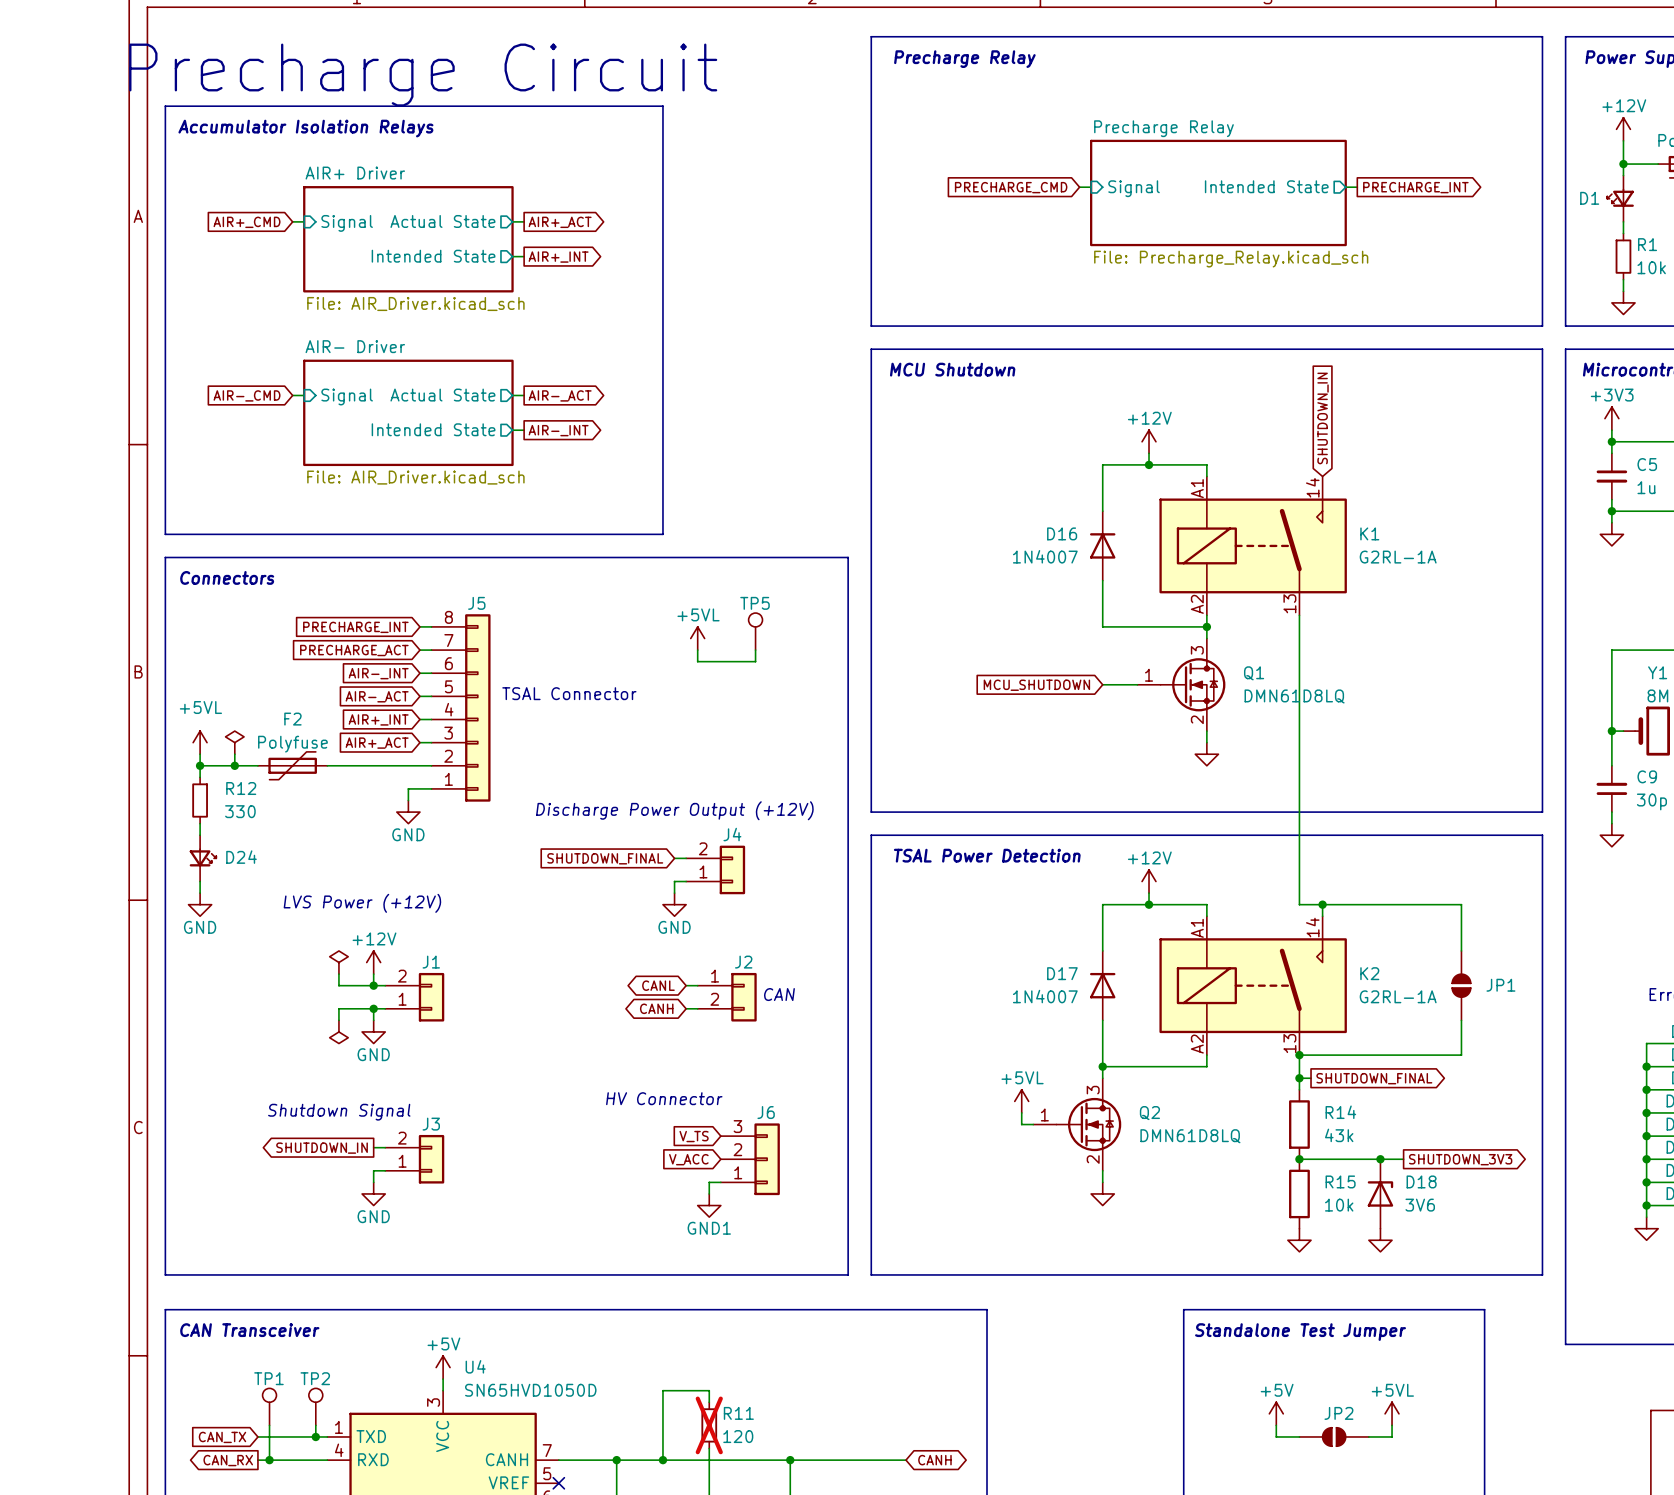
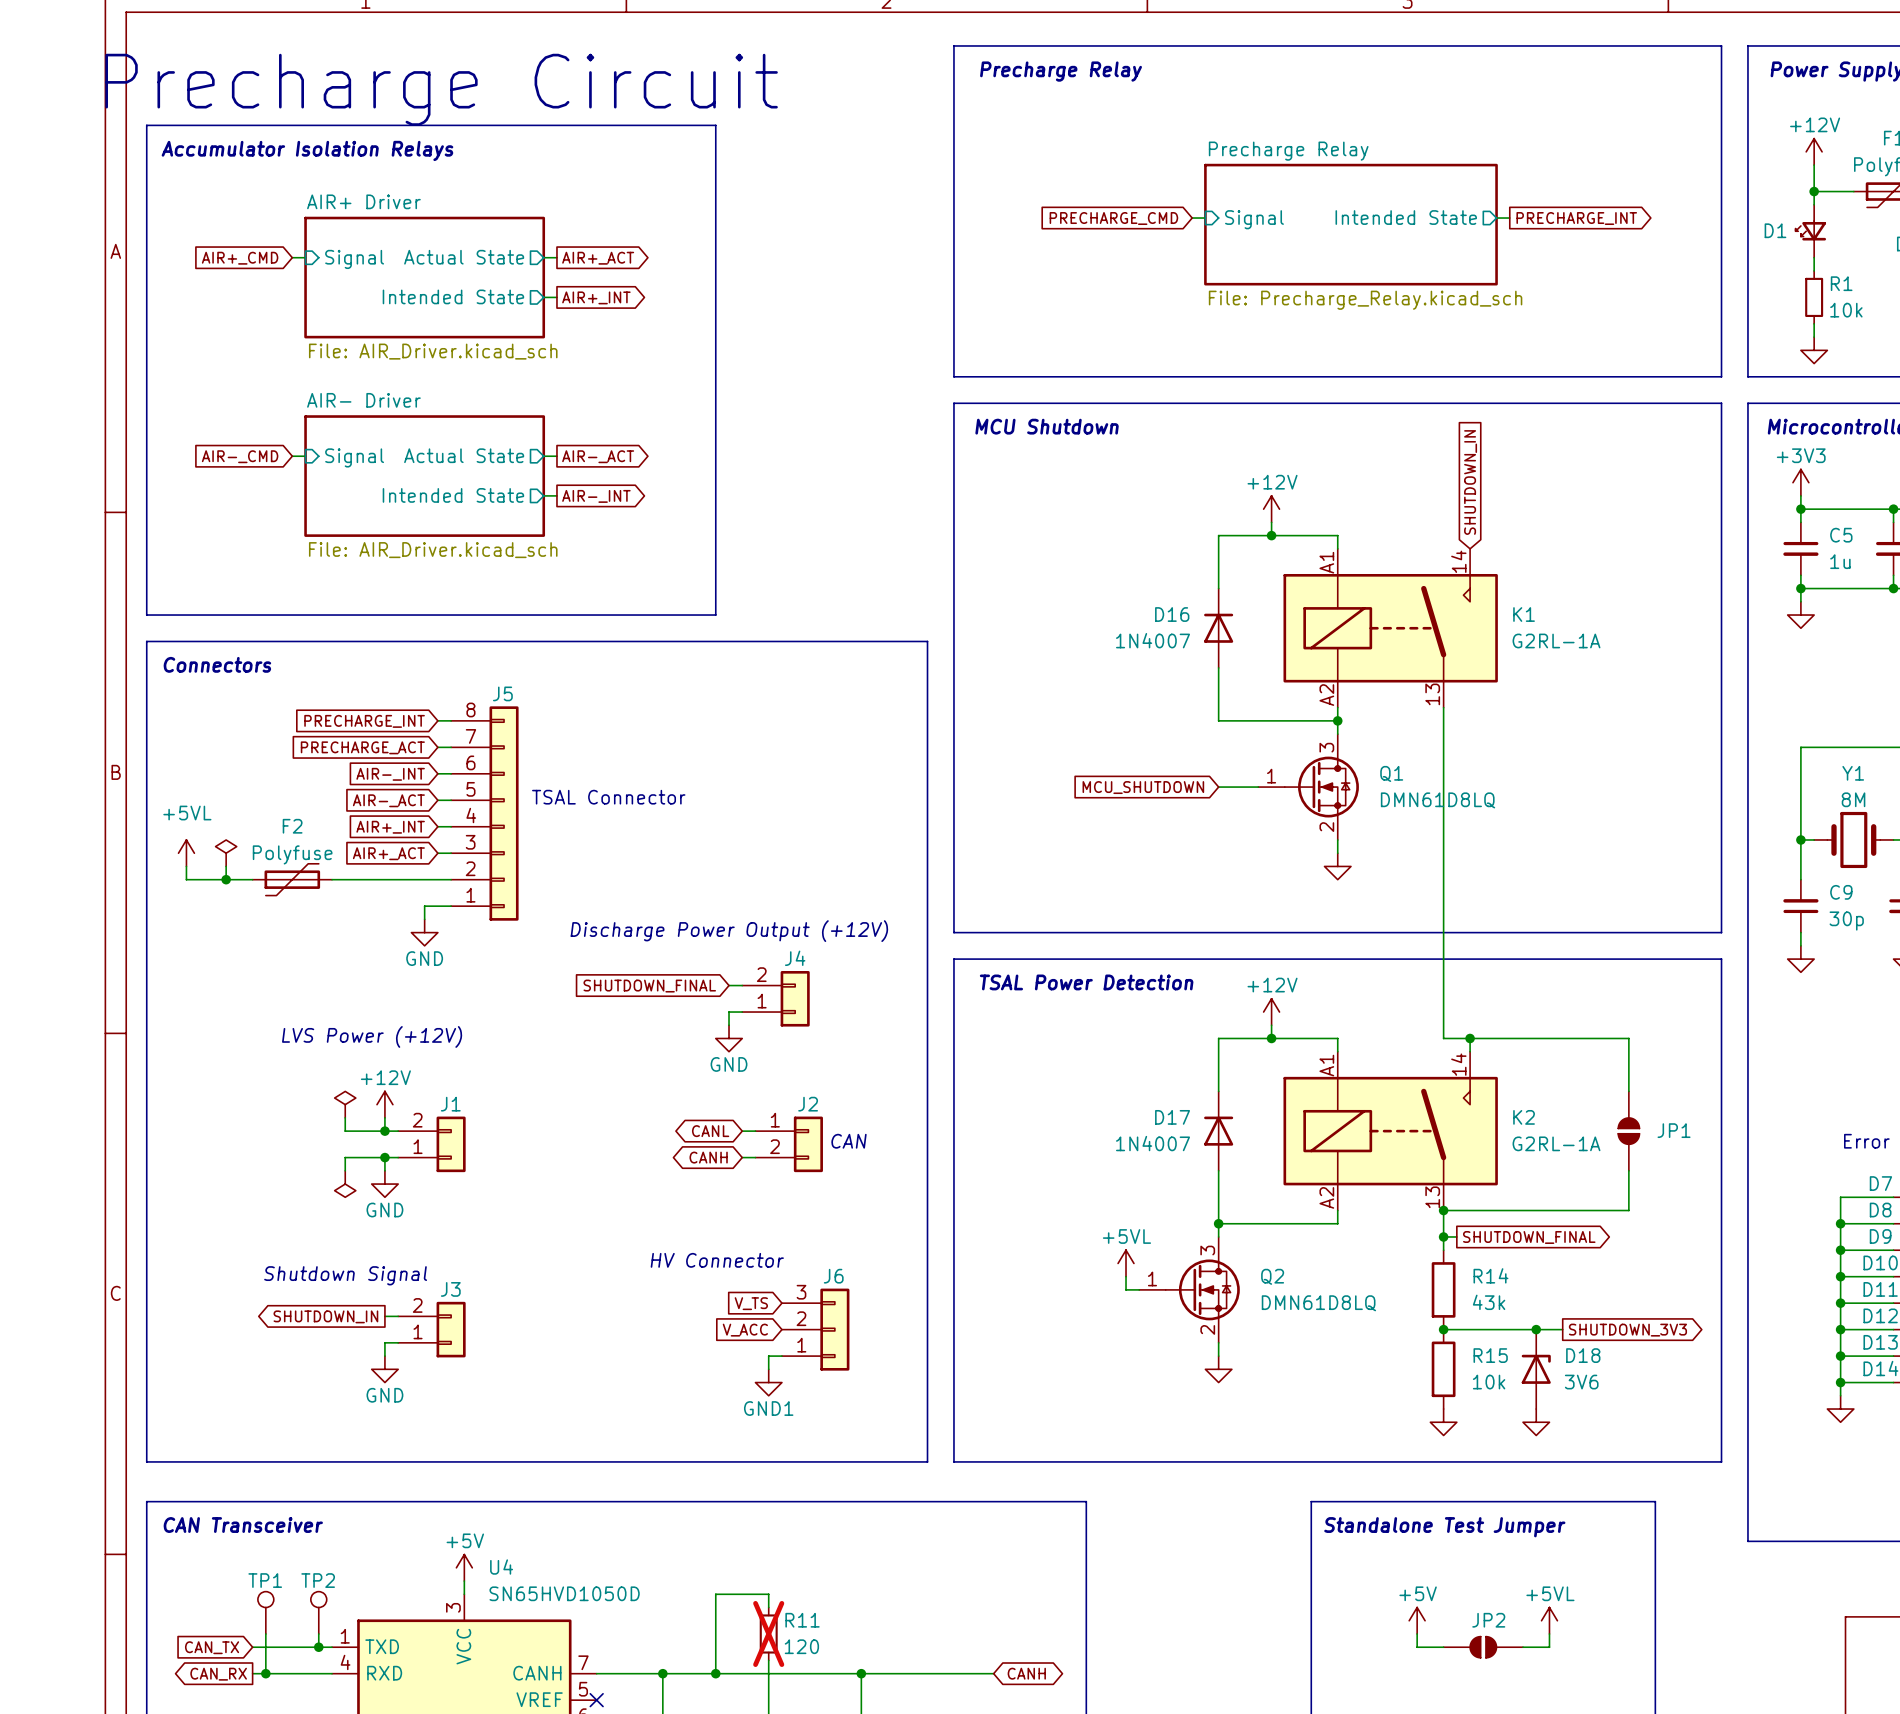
TP5: (755, 631) -> none
power symbol: +5VL (697, 638) -> none
wire: (697, 650) (697, 661) (755, 661) (755, 650) -> none
wire: (200, 765) (200, 777) -> none
junction: (200, 765) -> none
R12: 330 (200, 800) -> none
wire: (200, 823) (200, 835) -> none
D24: (202, 858) -> none
wire: (200, 881) (200, 893) -> none
power symbol: GND (200, 904) -> none

